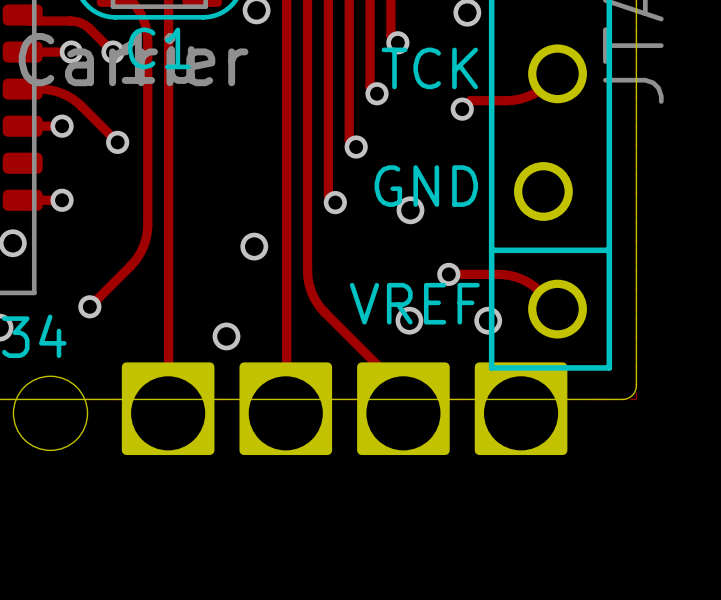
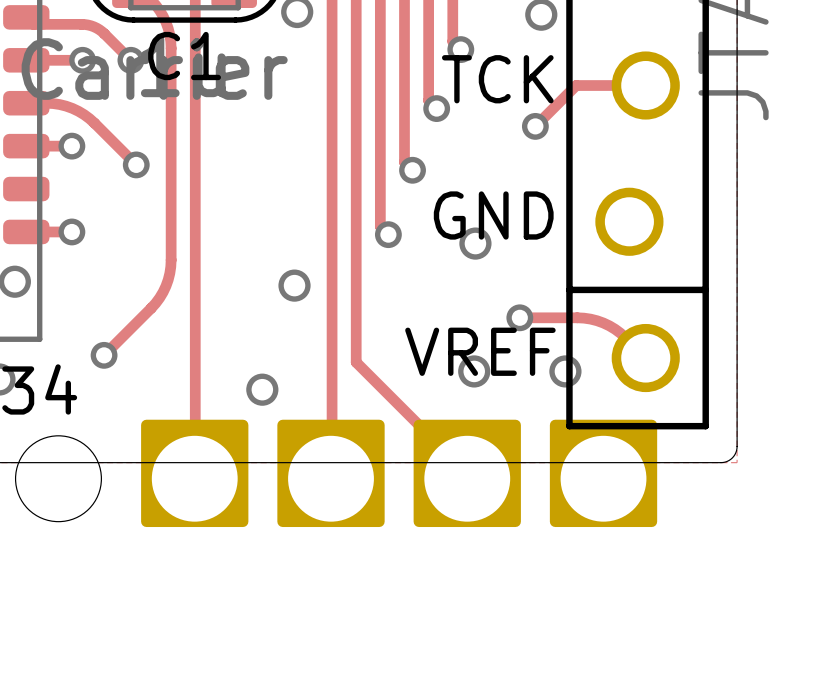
track: (557, 73) (538, 90) (523, 98) (506, 100) (470, 100) -> (645, 85) (576, 85) (545, 116)
track: (307, 270) (312, 293) (320, 308) (403, 391) (403, 413) -> (356, 313) (356, 362) (443, 450) (467, 450)

